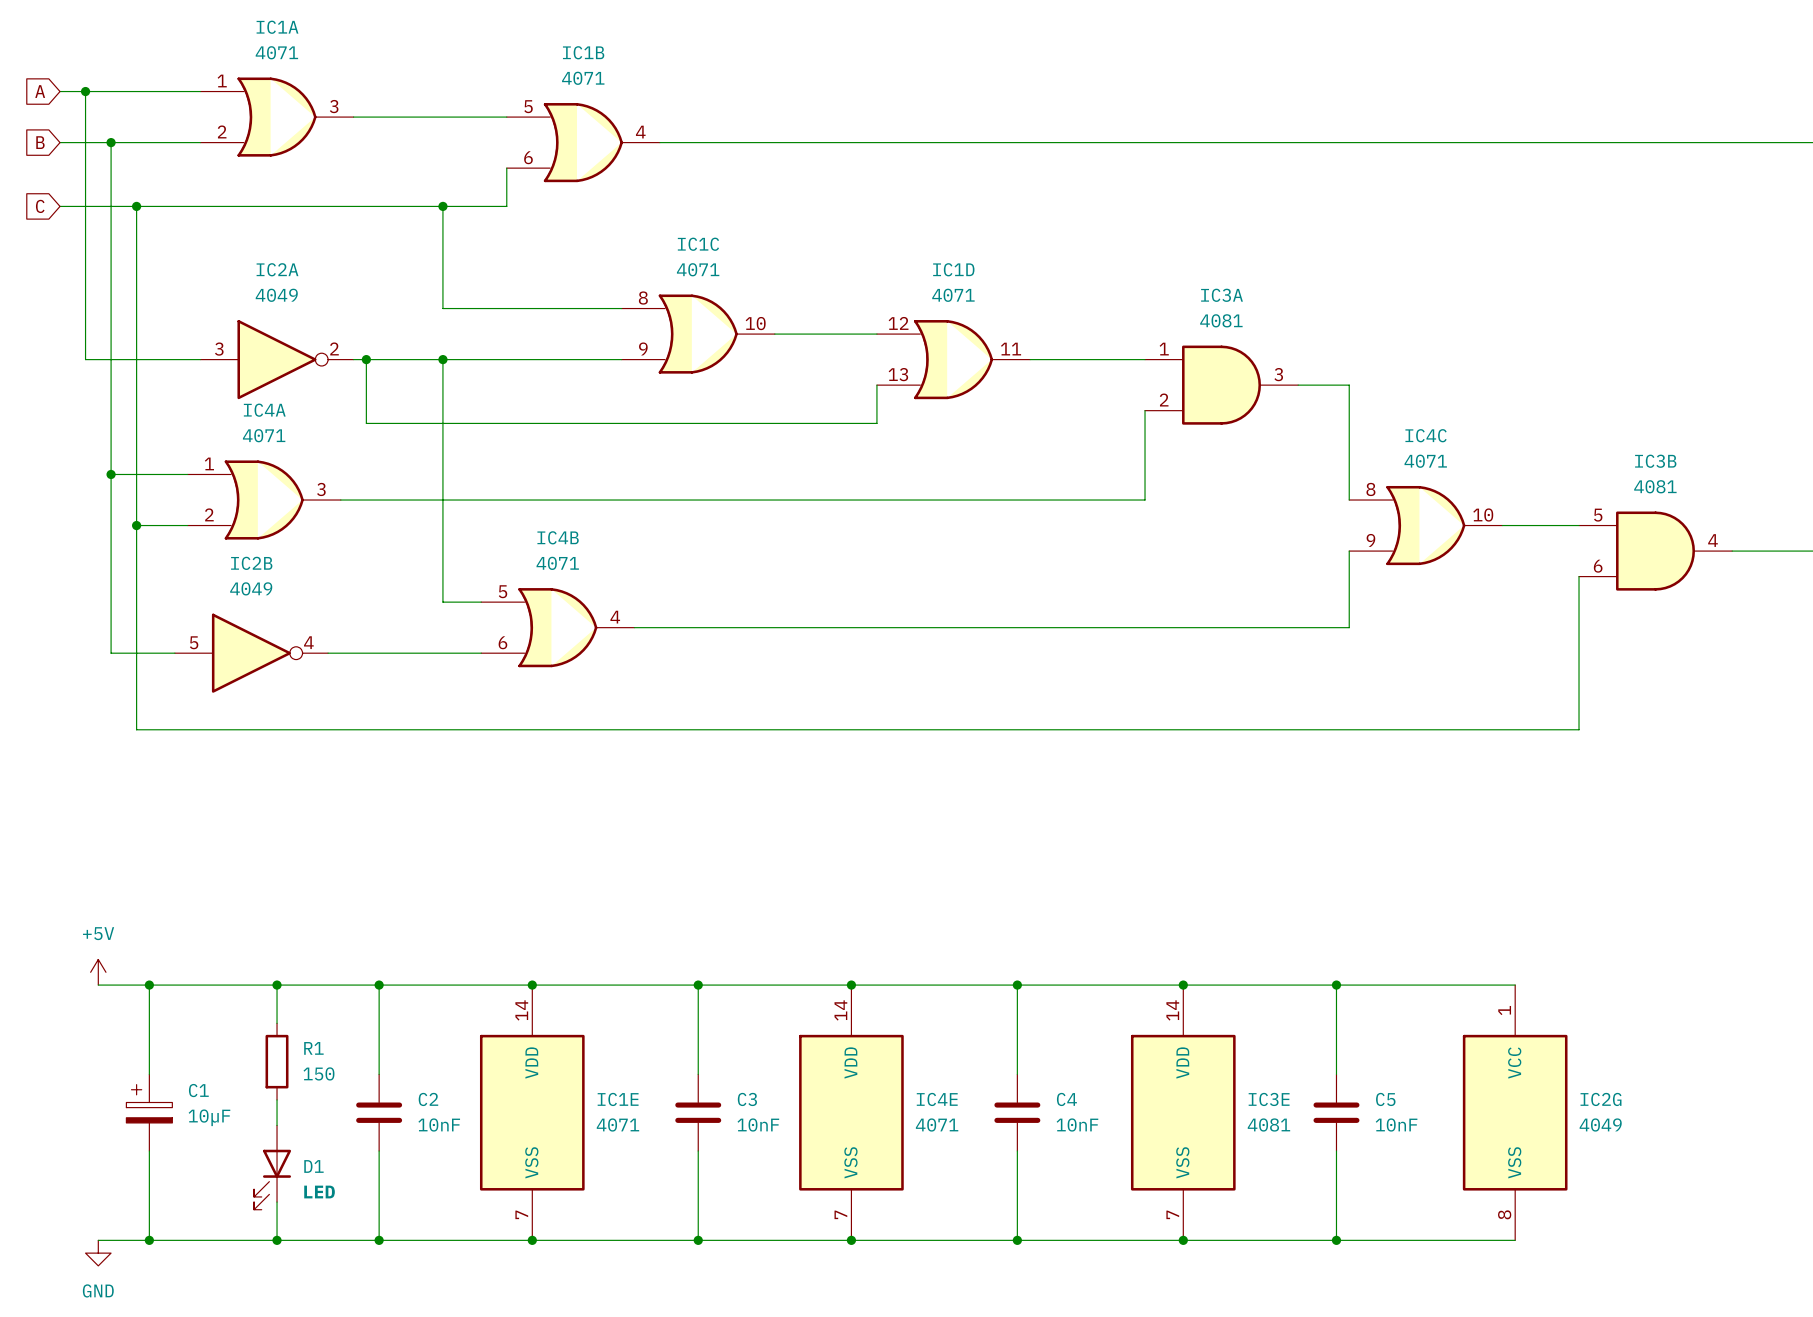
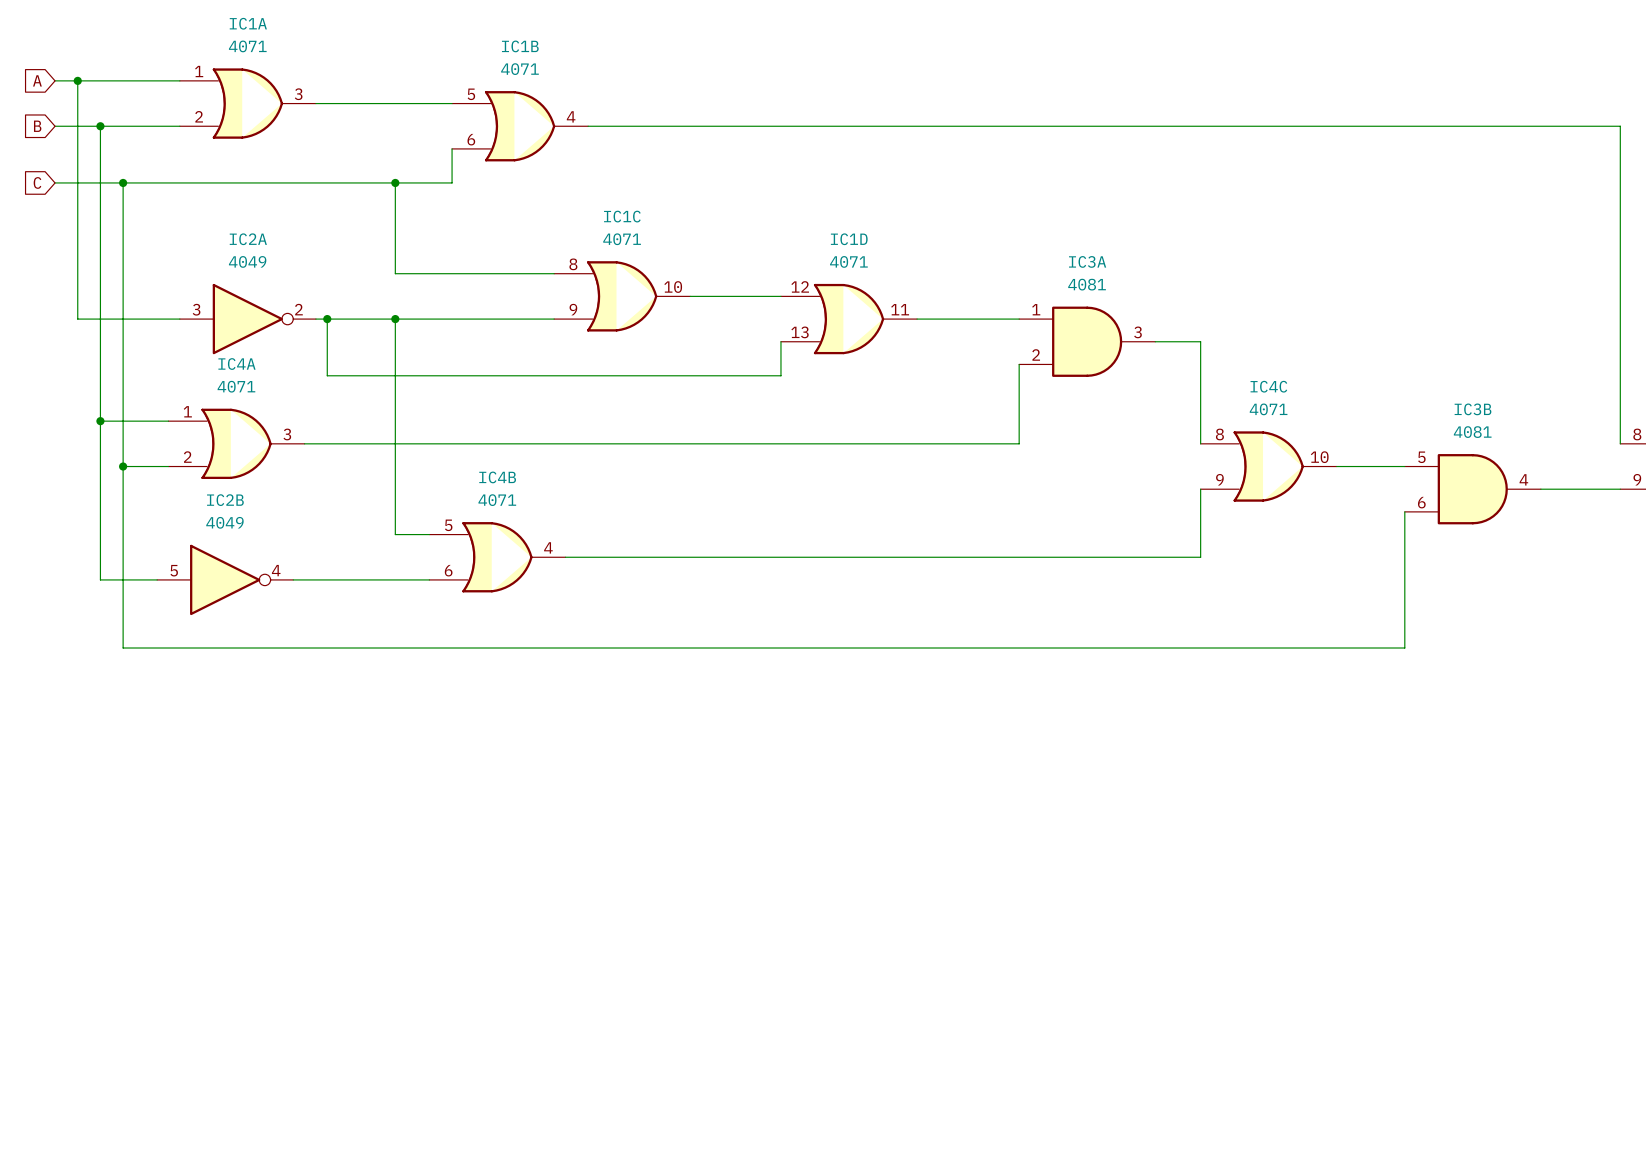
power symbol: +5V (98, 972) -> none
wire: (98, 985) (1515, 985) -> none
wire: (149, 985) (149, 1074) -> none
junction: (149, 985) -> none
wire: (277, 985) (277, 1023) -> none
junction: (277, 985) -> none
wire: (379, 985) (379, 1074) -> none
junction: (379, 985) -> none
junction: (532, 985) -> none
wire: (698, 985) (698, 1074) -> none
junction: (698, 985) -> none
junction: (851, 985) -> none
wire: (1017, 985) (1017, 1074) -> none
junction: (1017, 985) -> none
junction: (1183, 985) -> none
wire: (1336, 985) (1336, 1074) -> none
junction: (1336, 985) -> none
R1: 150 (277, 1061) -> none
wire: (277, 1099) (277, 1125) -> none
C1: 10µF (149, 1112) -> none
C2: 10nF (379, 1112) -> none
IC1E: 4071 (532, 1112) -> none
C3: 10nF (698, 1112) -> none
IC4E: 4071 (851, 1112) -> none
C4: 10nF (1017, 1112) -> none
IC3E: 4081 (1183, 1112) -> none
C5: 10nF (1336, 1112) -> none
IC2G: 4049 (1515, 1112) -> none
wire: (149, 1151) (149, 1240) -> none
wire: (379, 1151) (379, 1240) -> none
wire: (698, 1151) (698, 1240) -> none
wire: (1017, 1151) (1017, 1240) -> none
wire: (1336, 1151) (1336, 1240) -> none
D1: LED (272, 1167) -> none
wire: (277, 1202) (277, 1240) -> none
wire: (98, 1240) (1515, 1240) -> none
junction: (149, 1240) -> none
junction: (277, 1240) -> none
junction: (379, 1240) -> none
junction: (532, 1240) -> none
junction: (698, 1240) -> none
junction: (851, 1240) -> none
junction: (1017, 1240) -> none
junction: (1183, 1240) -> none
junction: (1336, 1240) -> none
power symbol: GND (98, 1253) -> none

